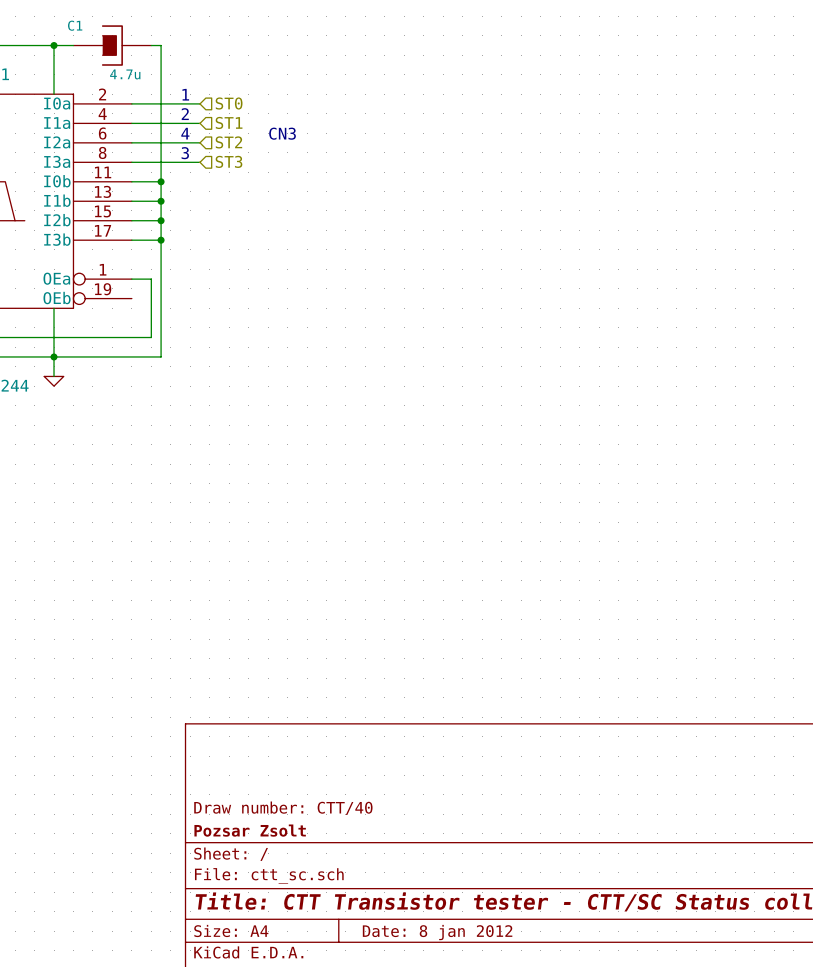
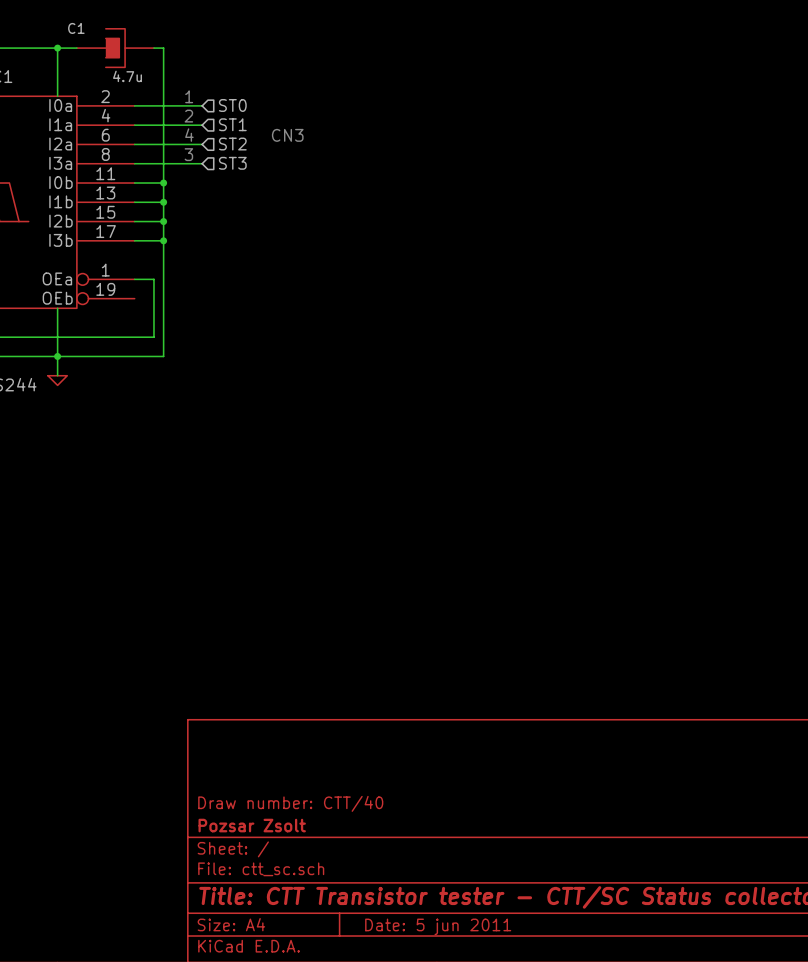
title block: Date: 8 jan 2012 (437, 932) -> Date: 5 jun 2011 (438, 926)

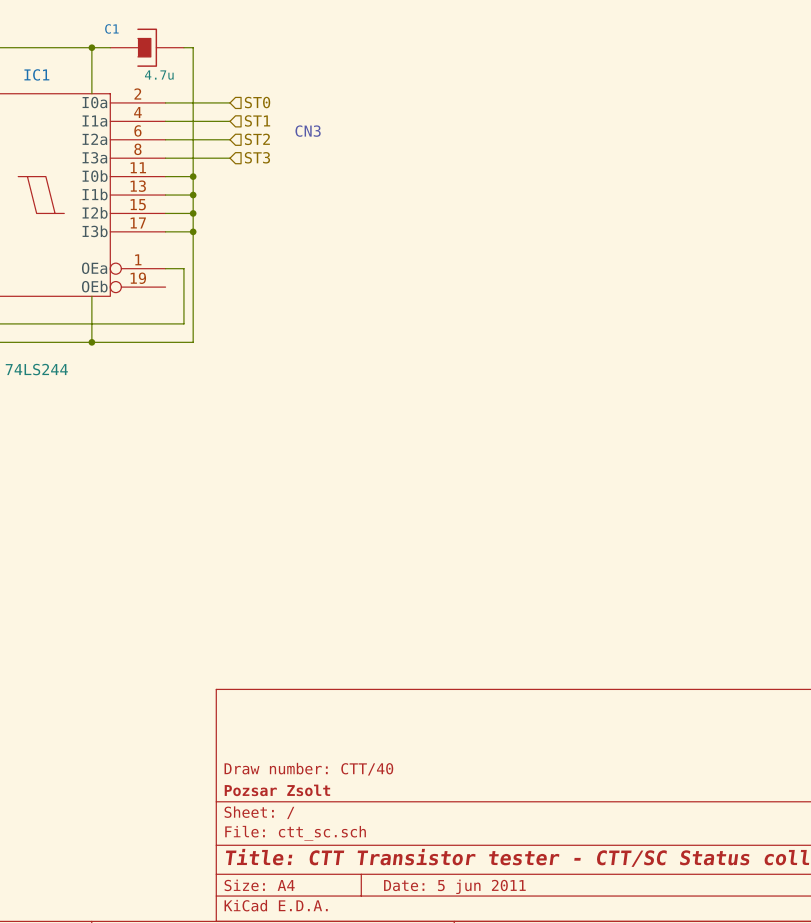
text: 1 (189, 96) -> none
text: 2 (188, 116) -> none
text: 4 (189, 135) -> none
text: 3 (188, 154) -> none
wire: (57, 356) (57, 375) -> none
power symbol: (57, 380) -> none

